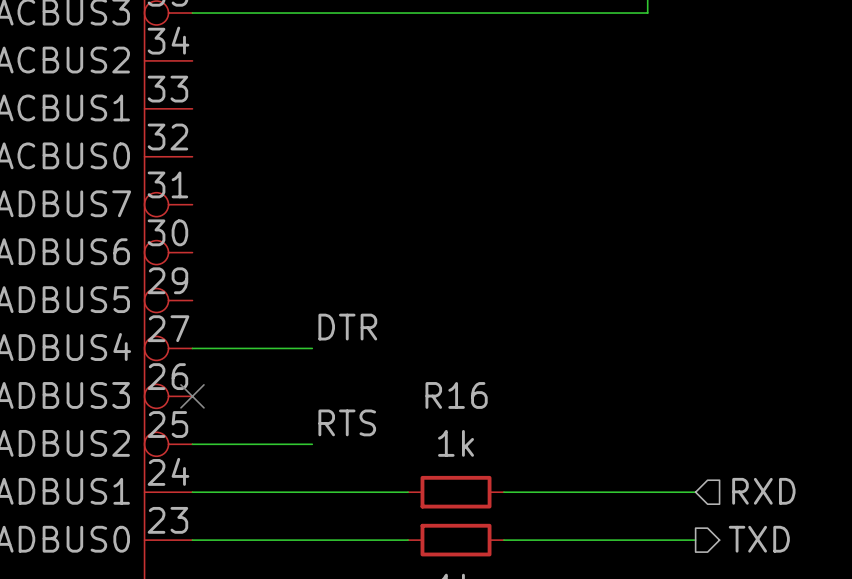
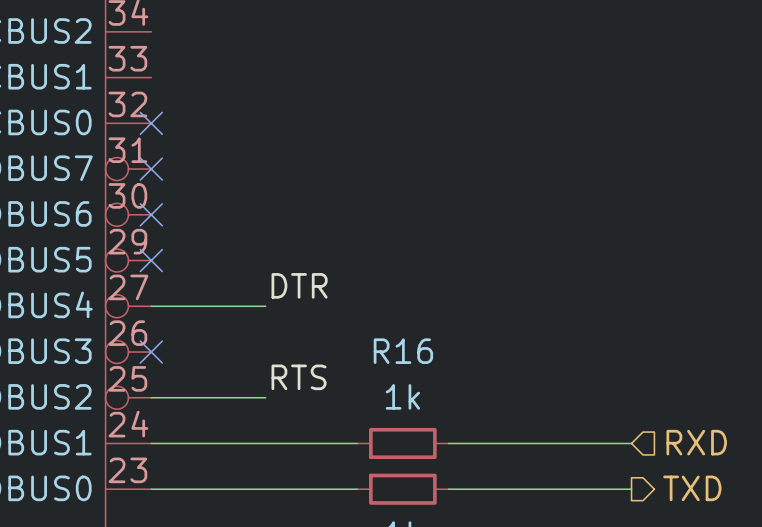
no-connect mark: none -> (151, 123)
no-connect mark: none -> (151, 169)
no-connect mark: none -> (151, 214)
no-connect mark: none -> (151, 260)

